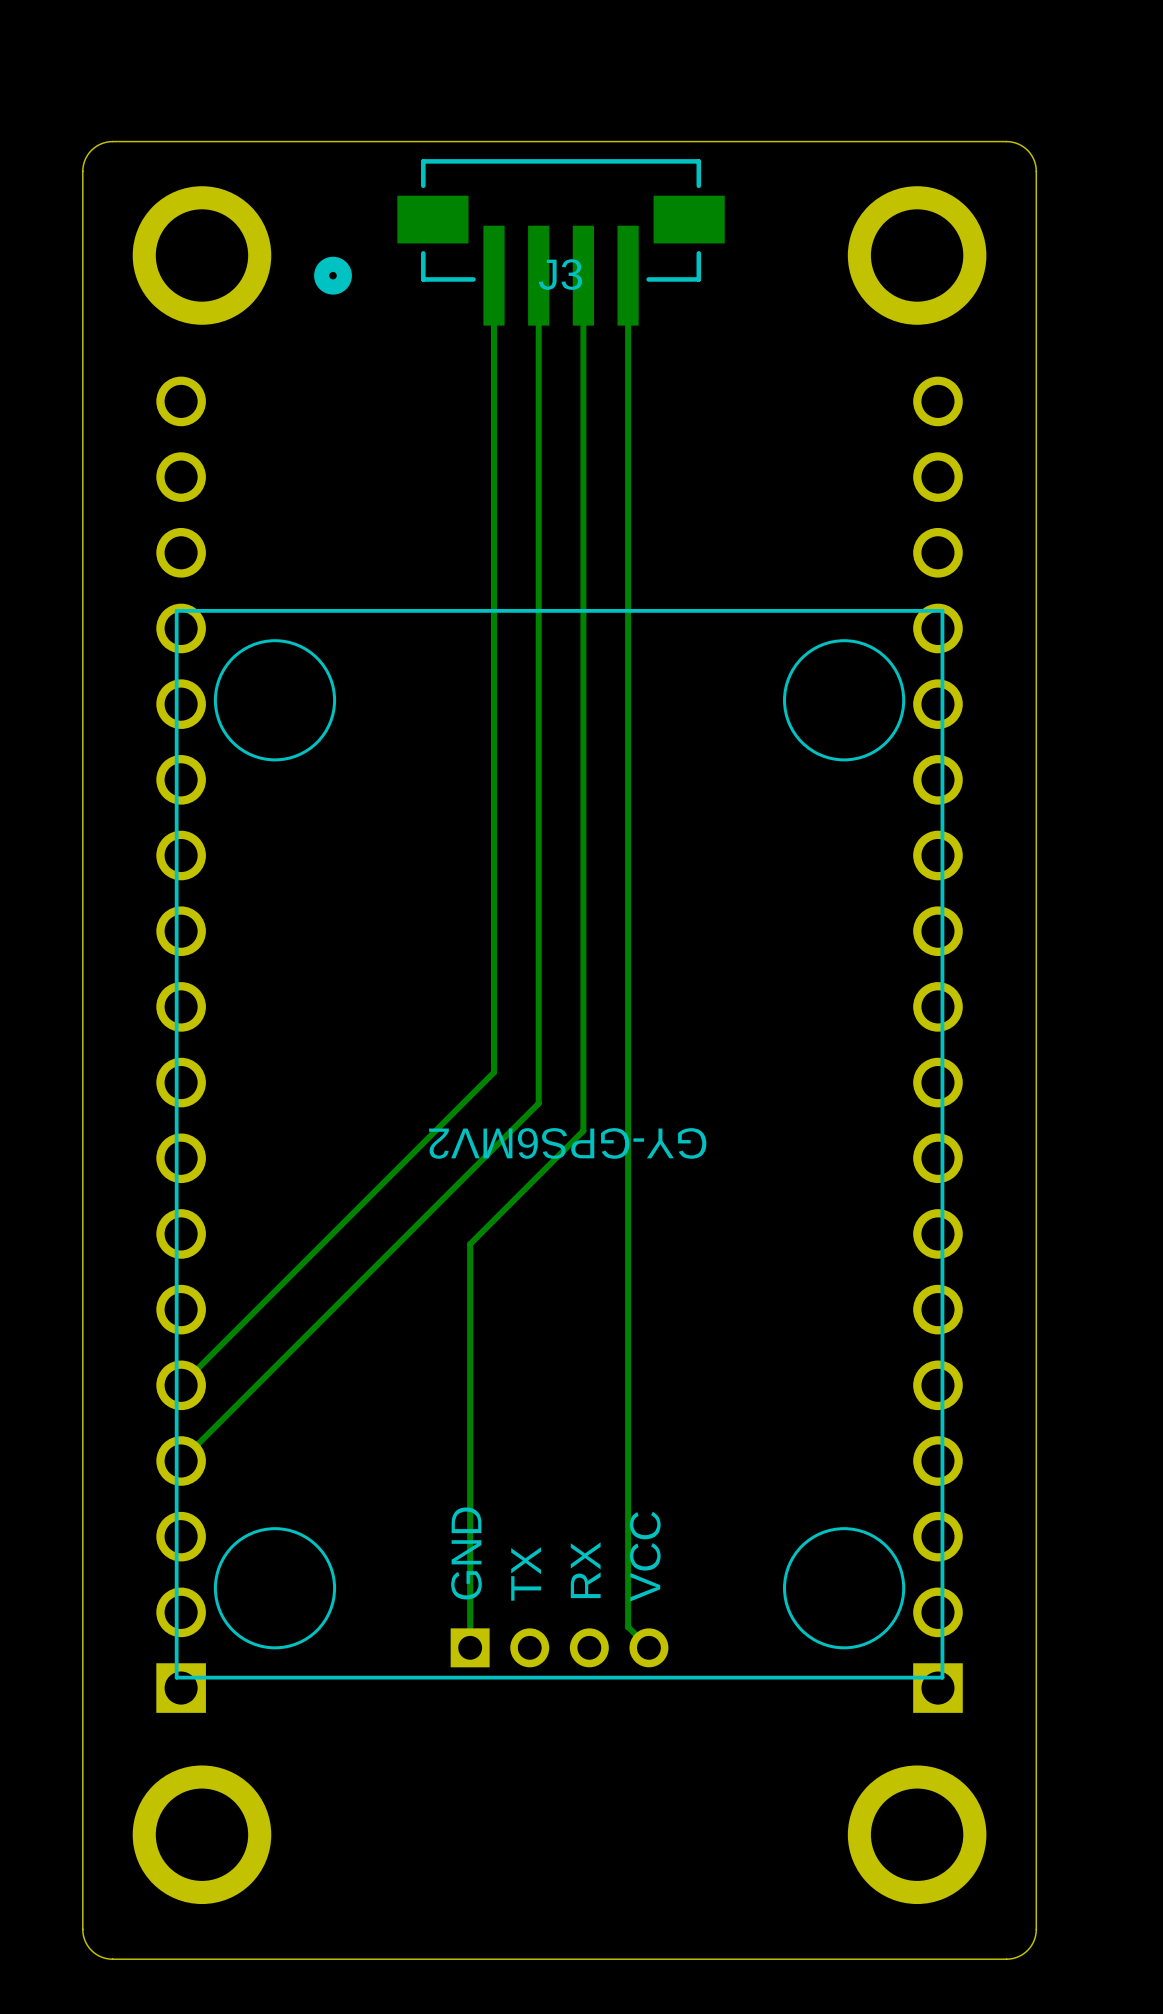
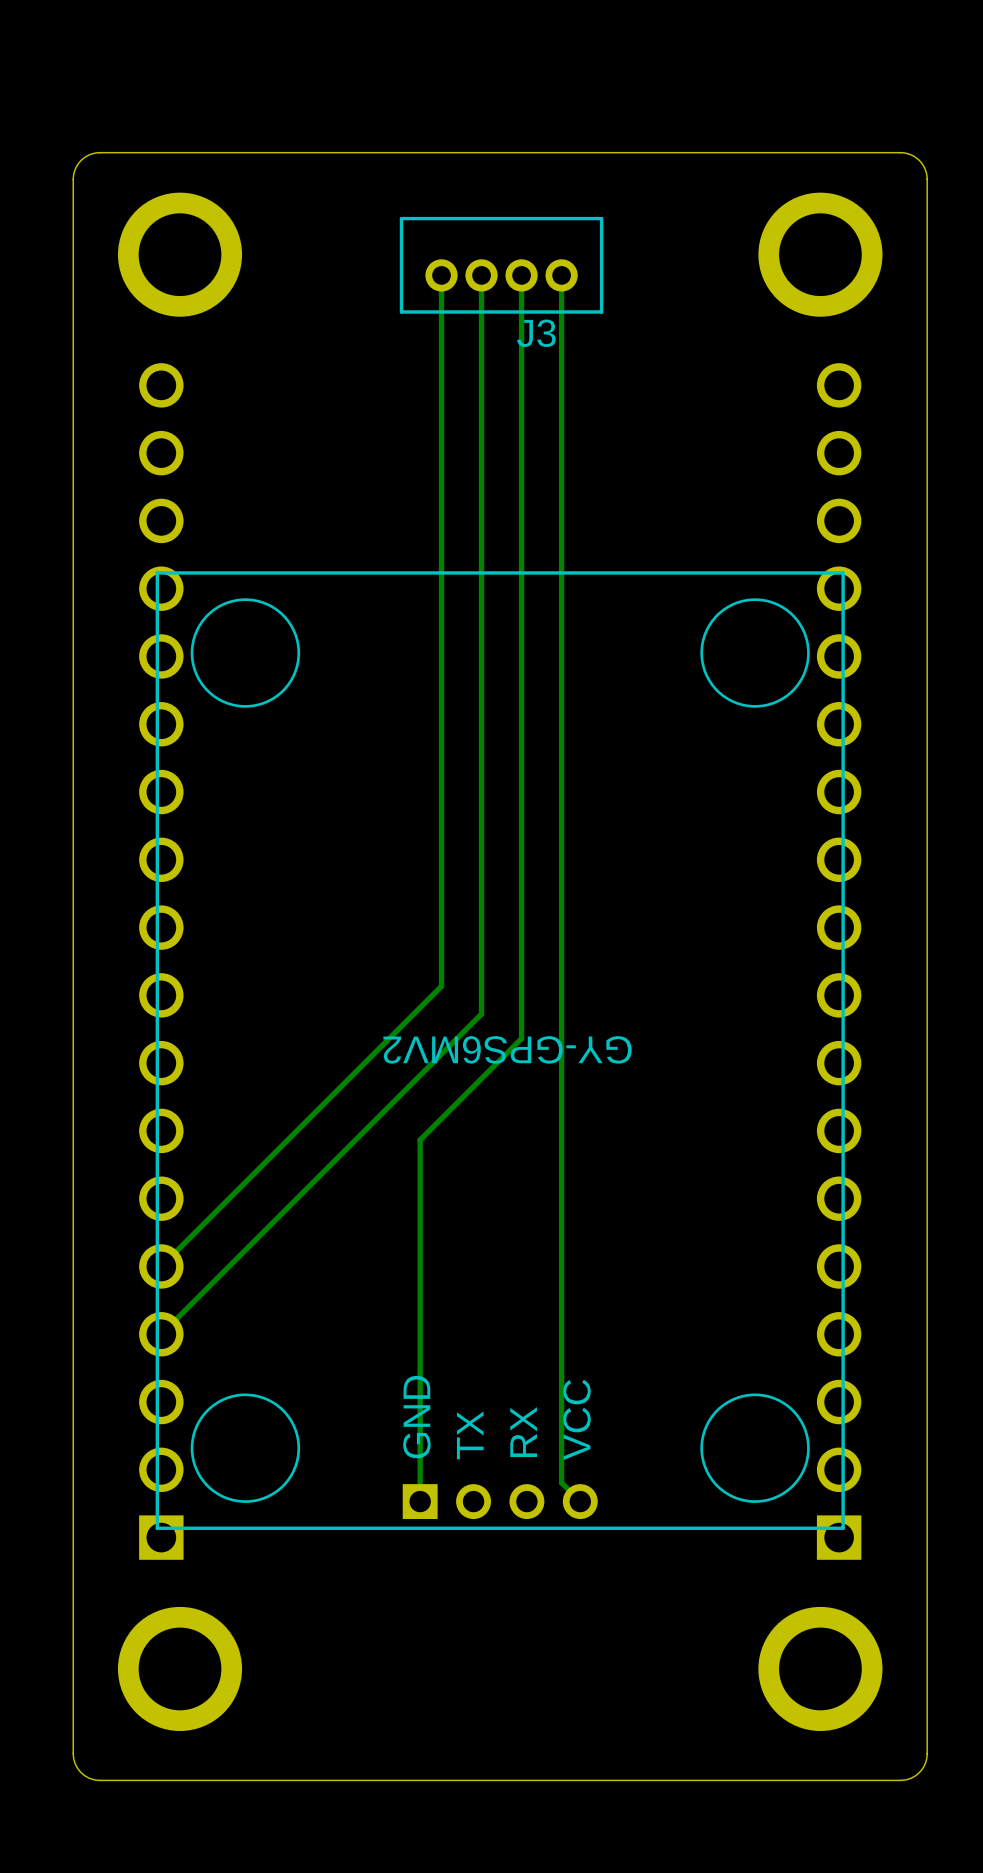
J3 footprint: [314, 159, 725, 326] -> [399, 216, 604, 314]

